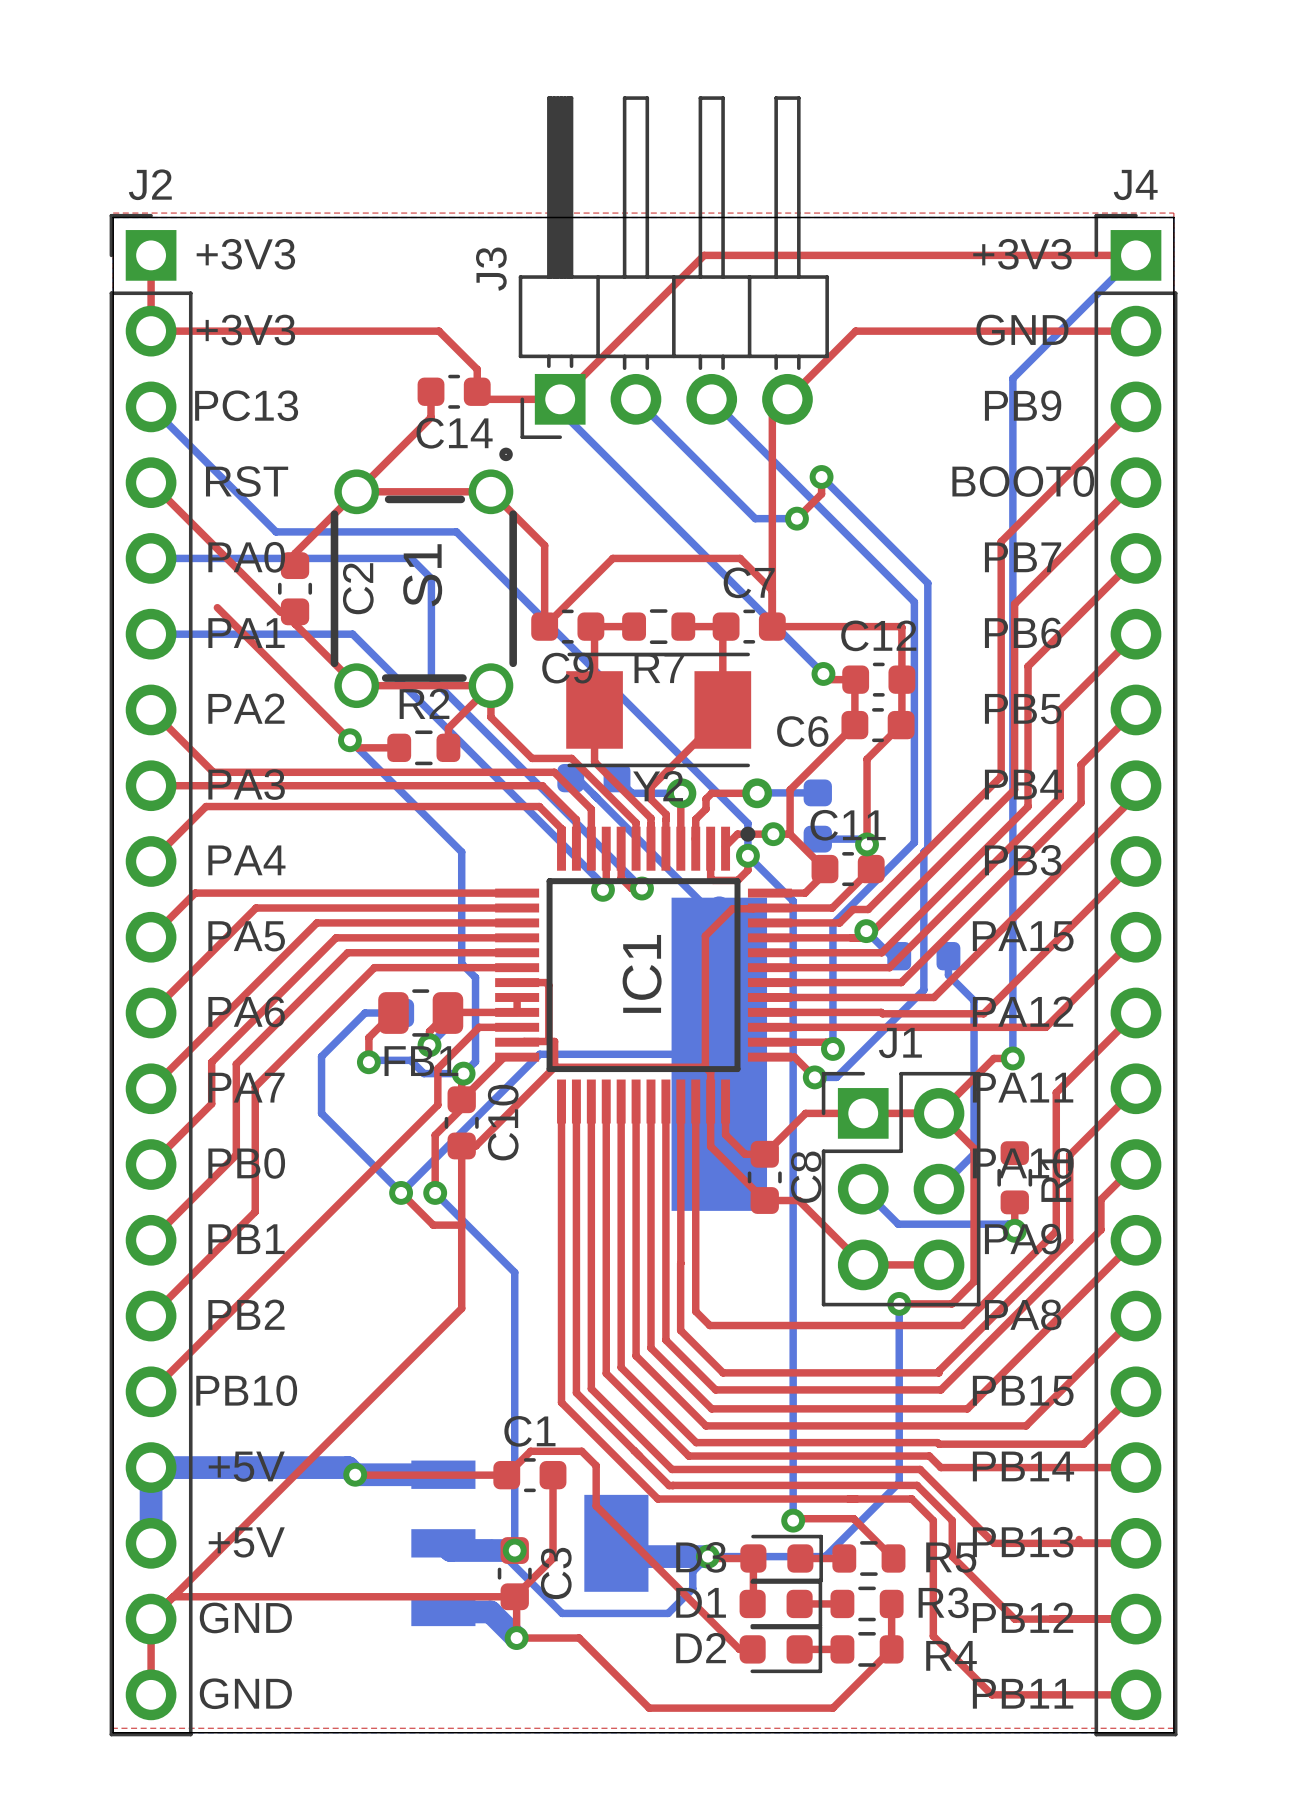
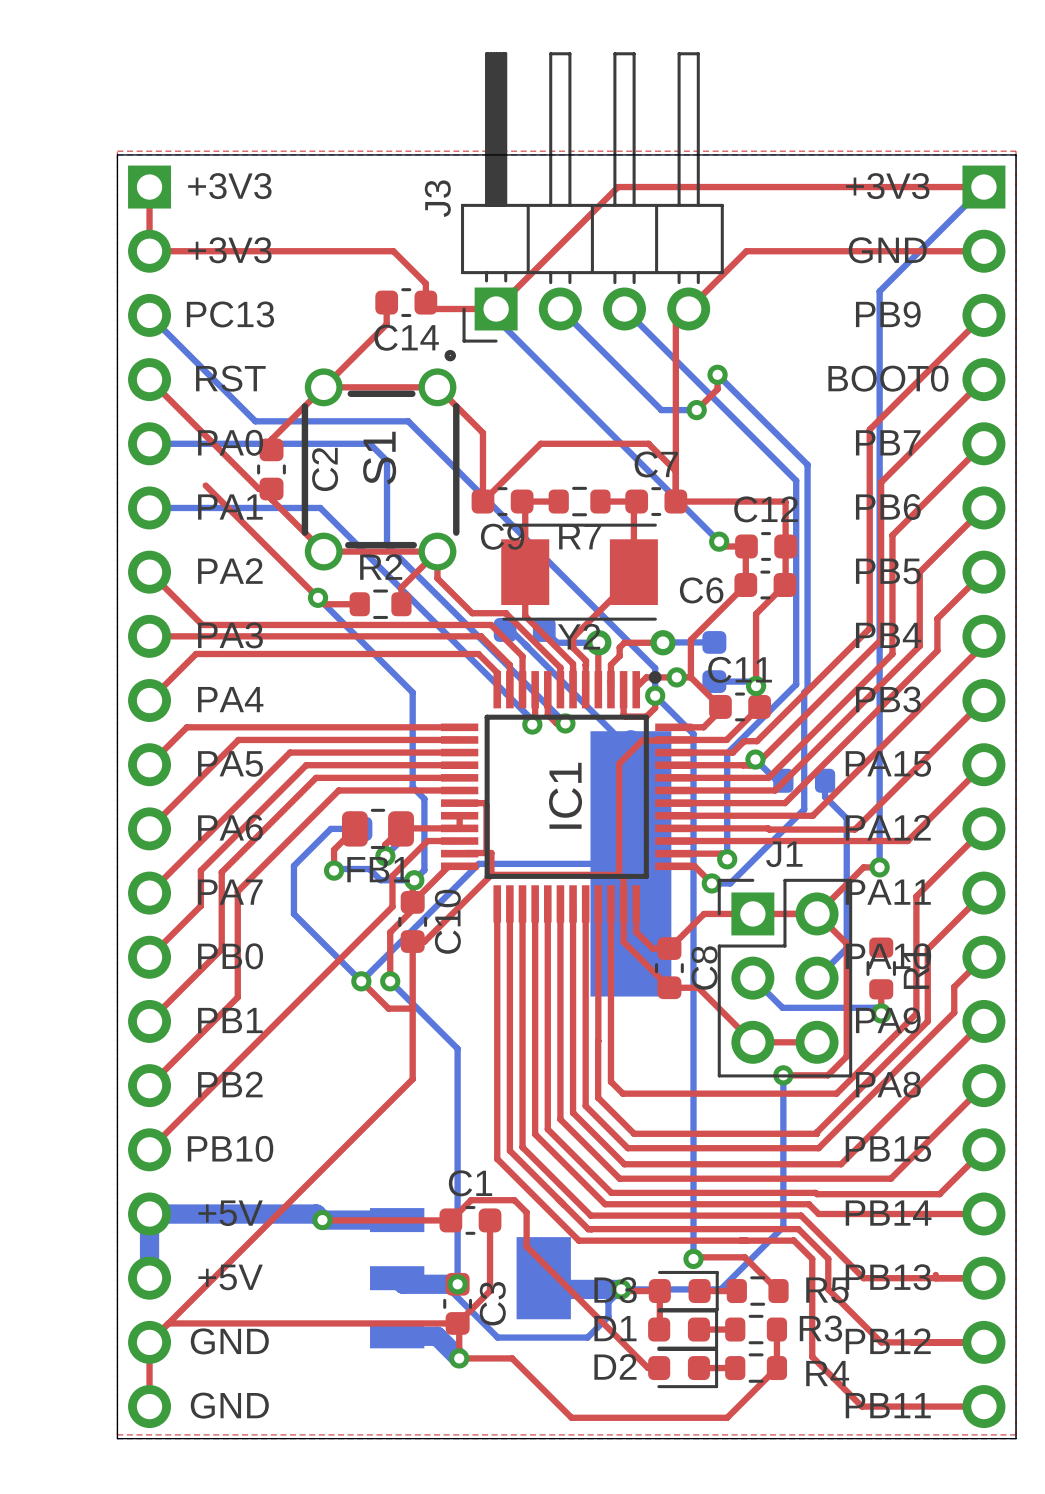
J2 side: top (151, 975) -> bottom (149, 796)
J4 side: top (1135, 975) -> bottom (983, 796)

